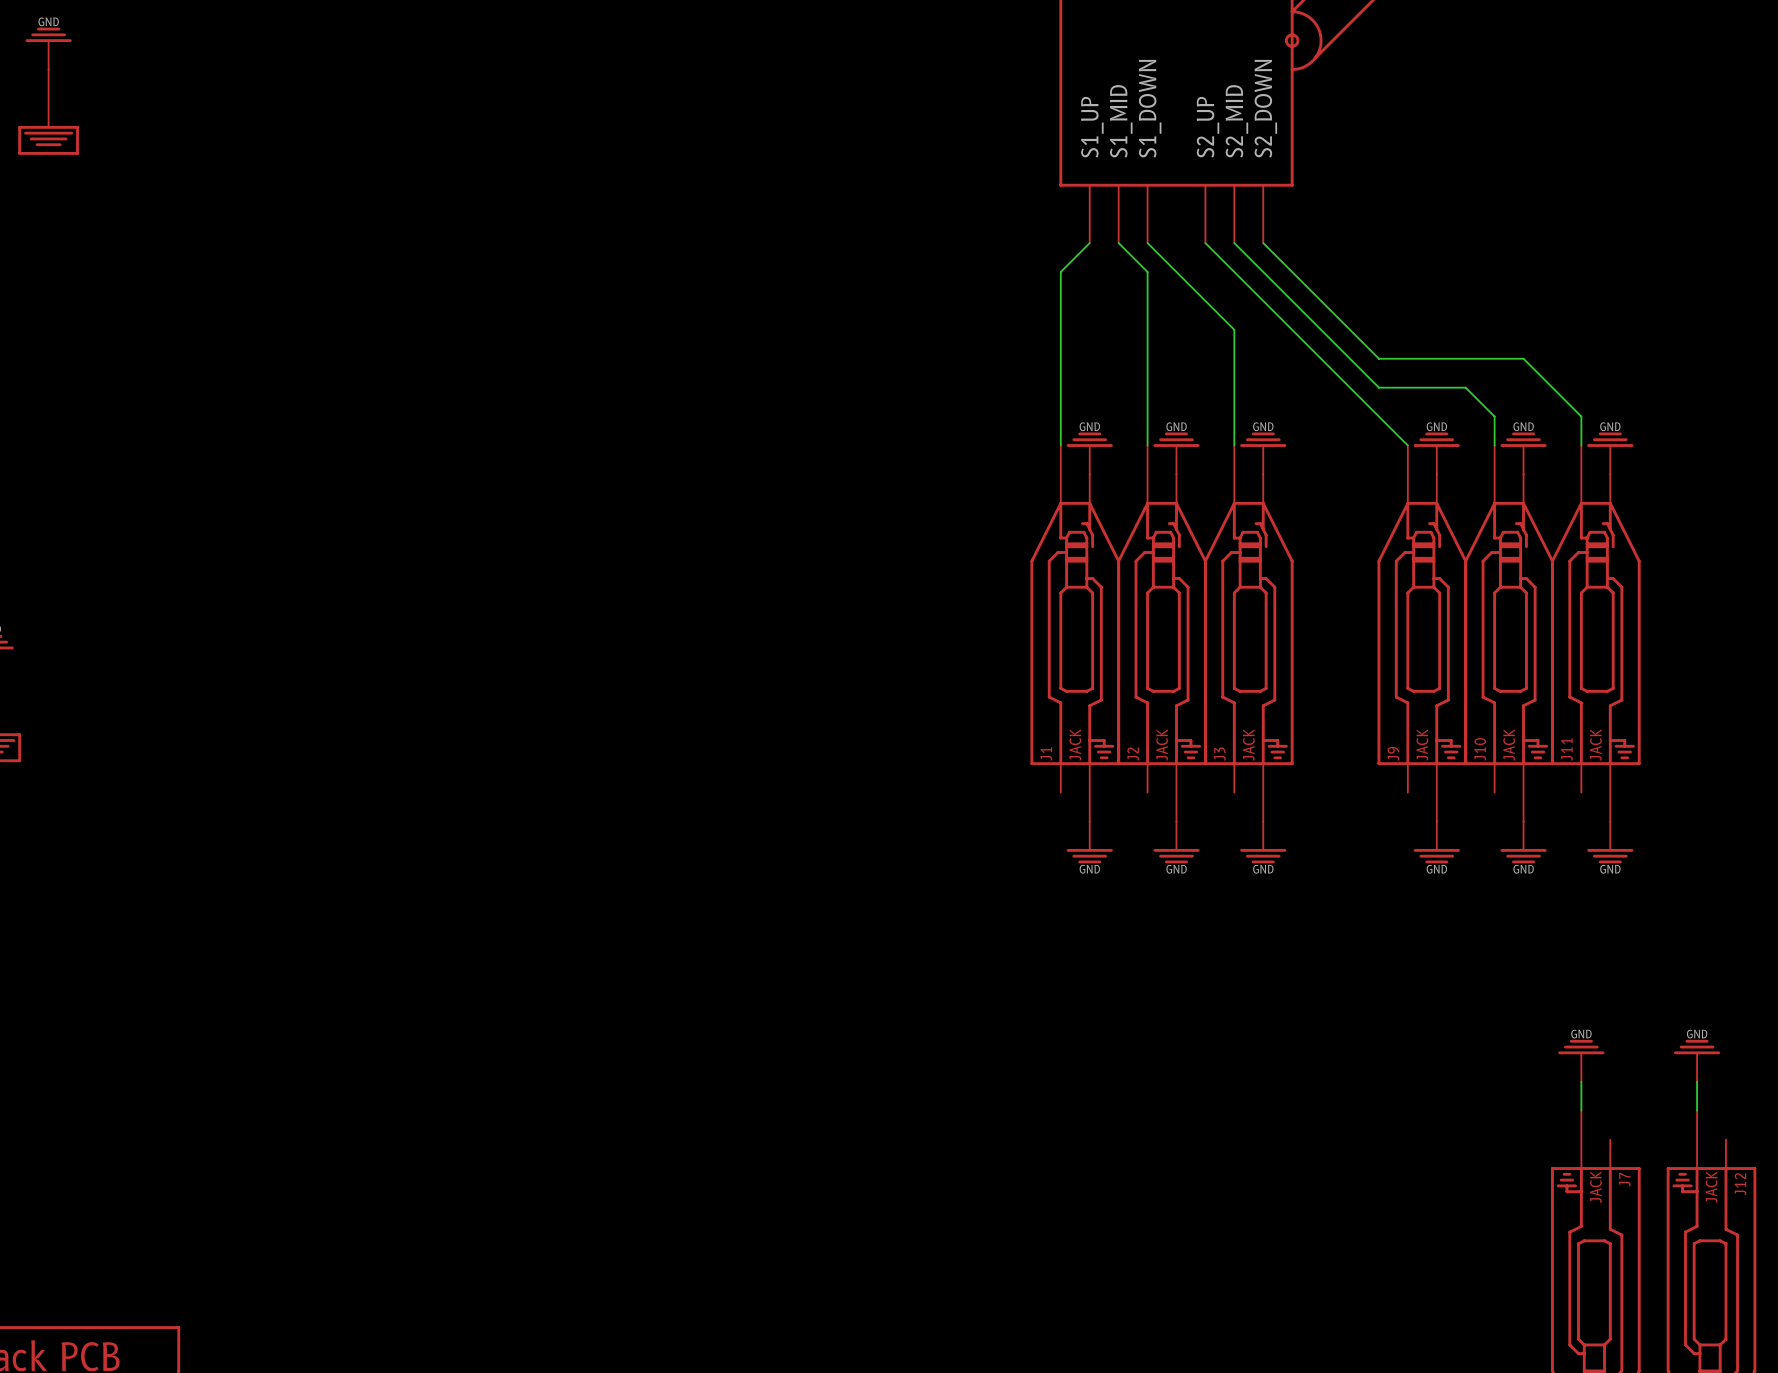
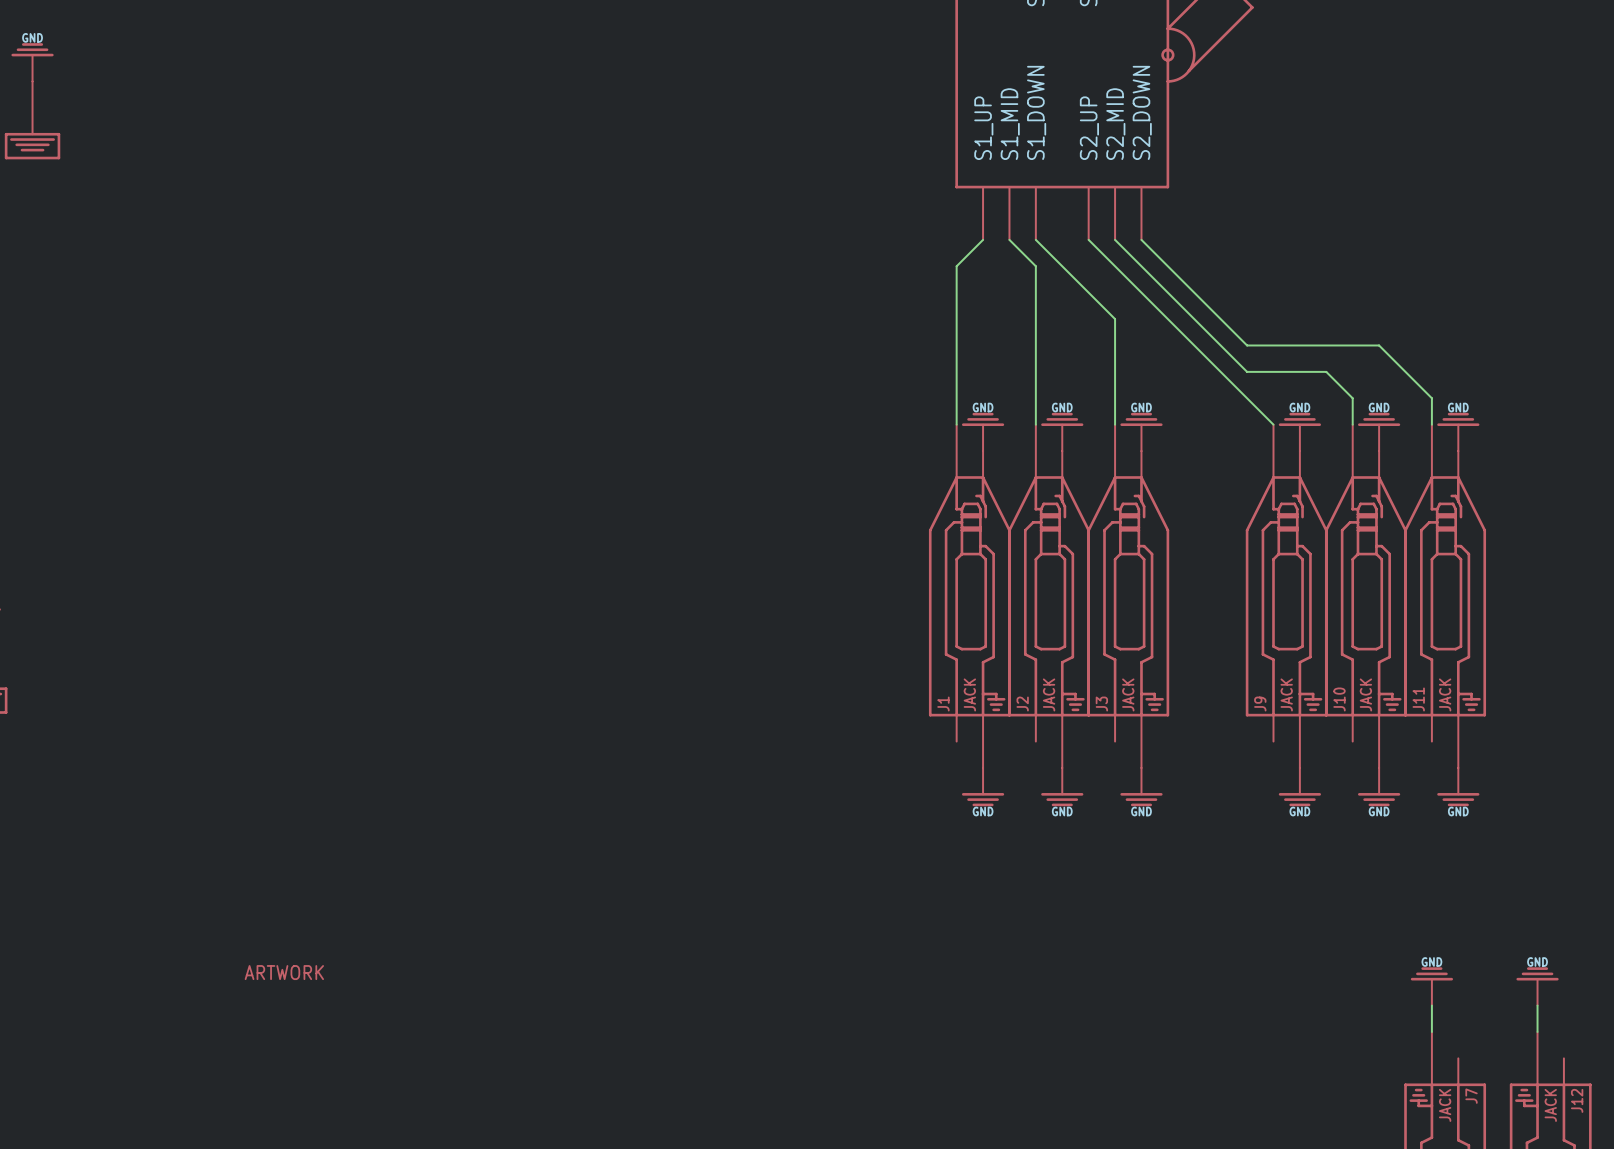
part: none -> (284, 972)

